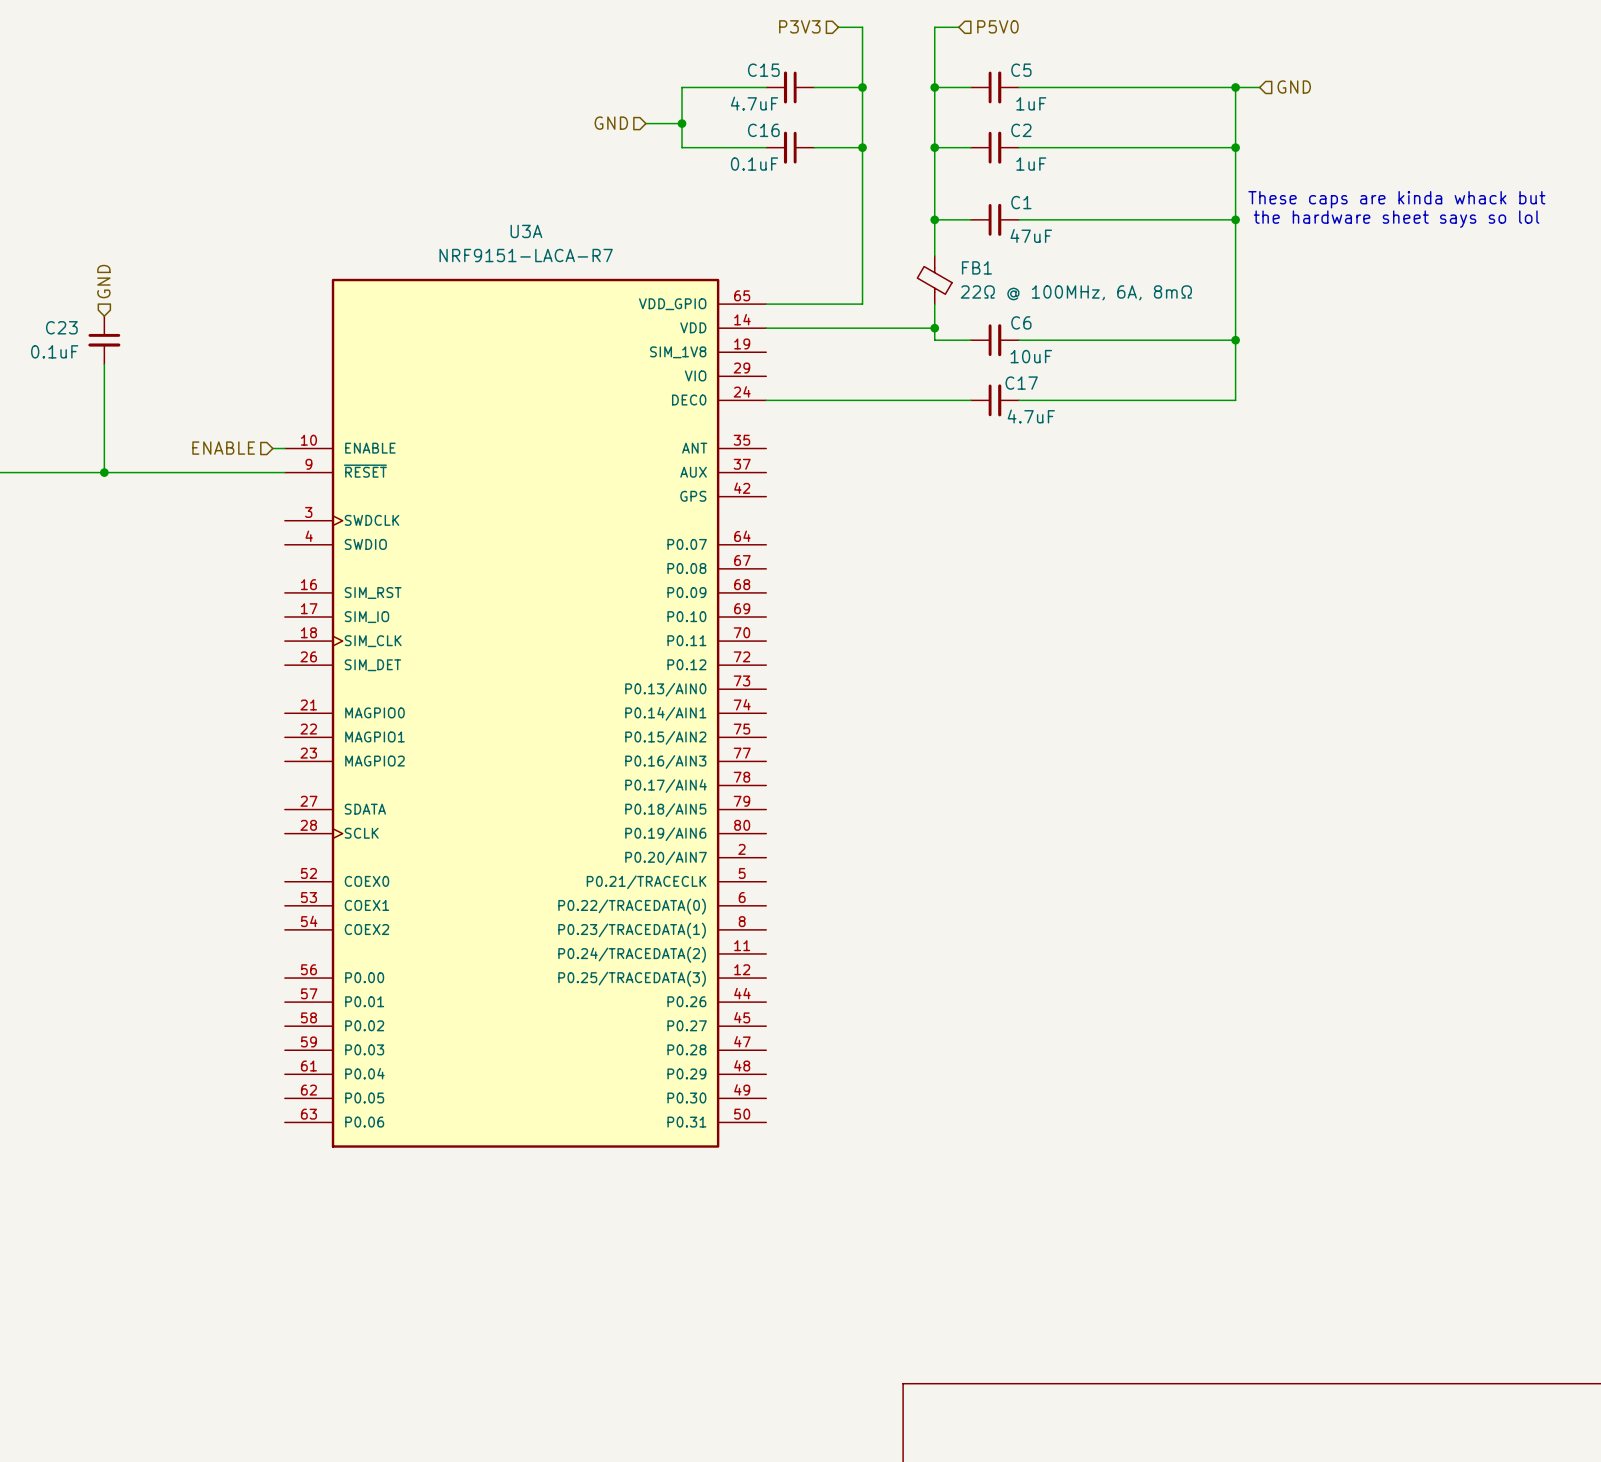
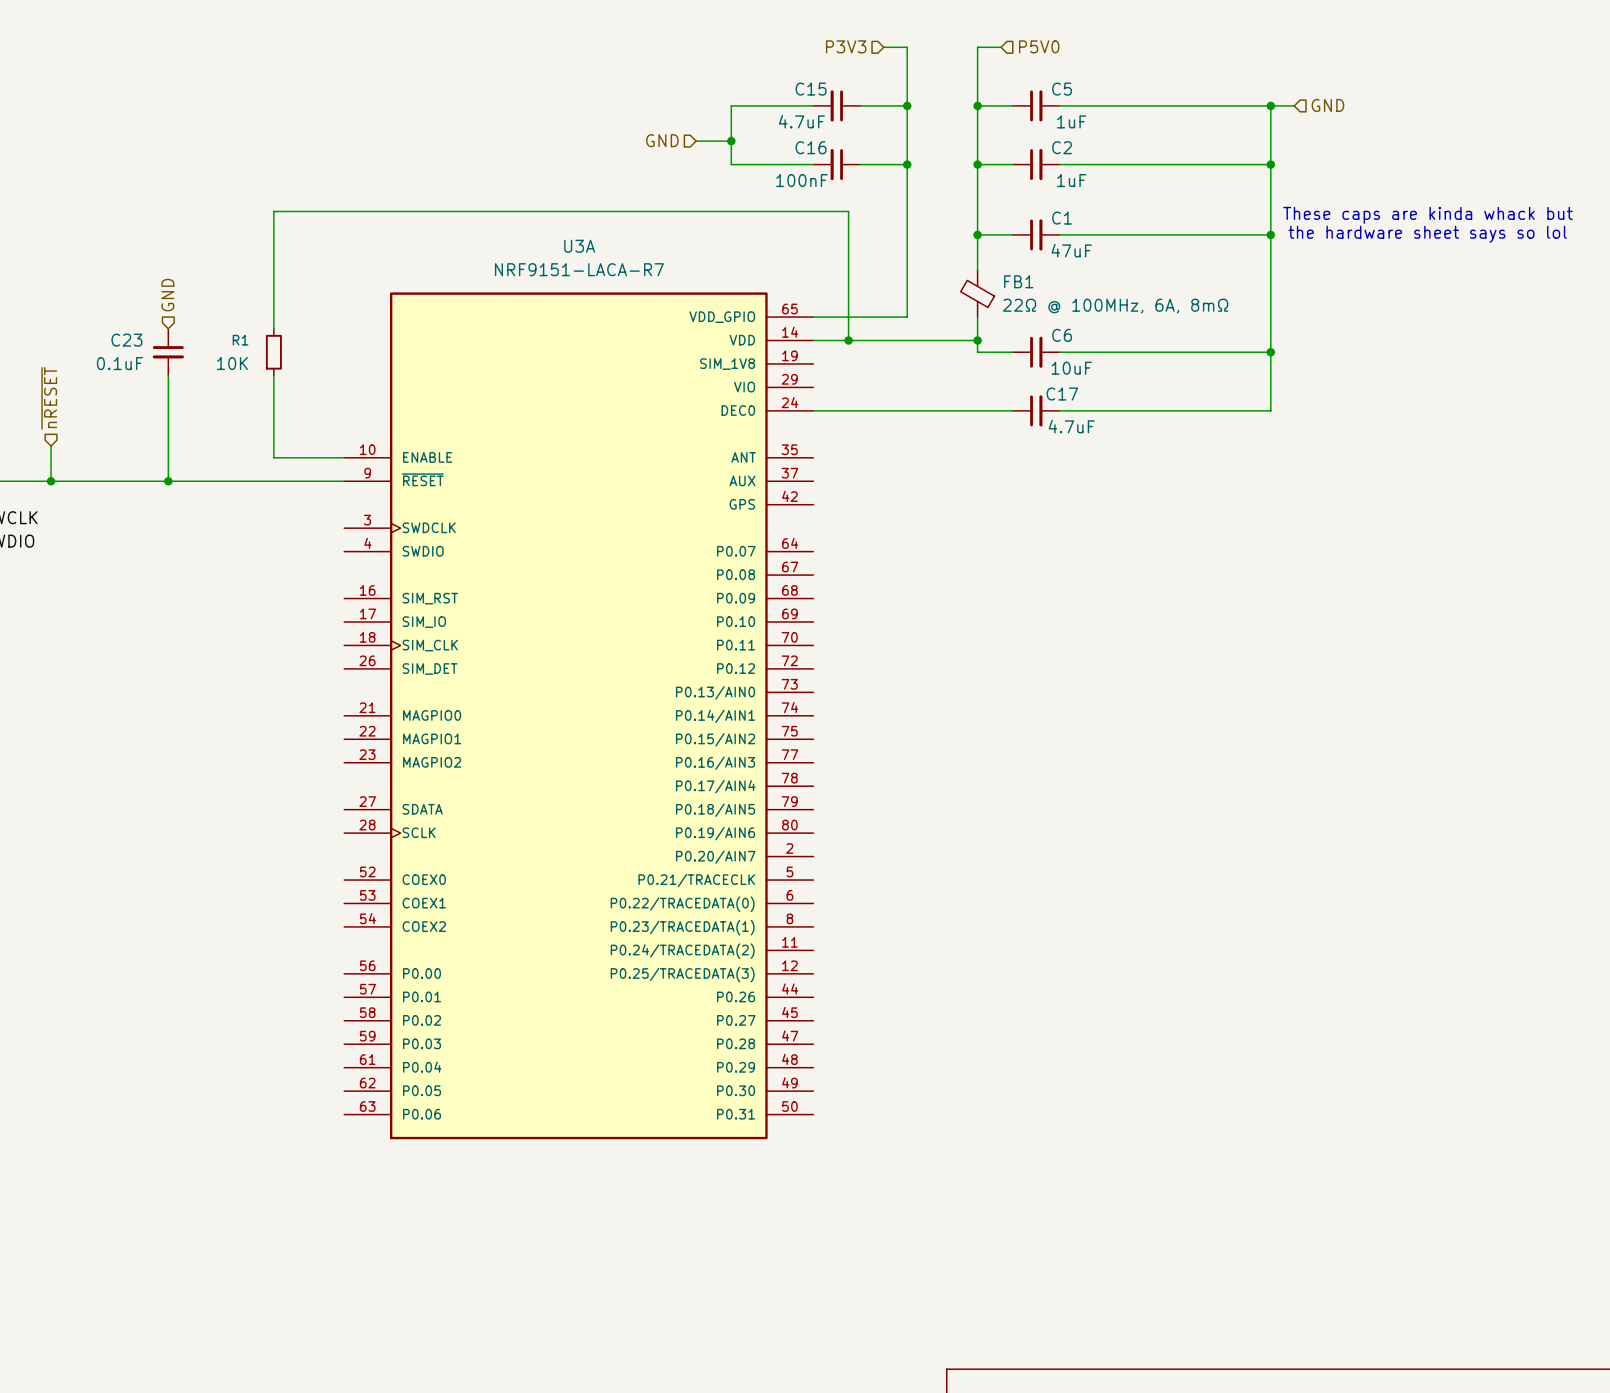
C16 value: 0.1uF (754, 164) -> 100nF (801, 180)
wire: none -> (273, 328) (273, 211) (848, 211) (848, 340)
junction: none -> (848, 340)
R1: none -> 10K (273, 352)
wire: none -> (273, 375) (273, 457) (332, 457)
hierarchical label: ENABLE (223, 448) -> none

